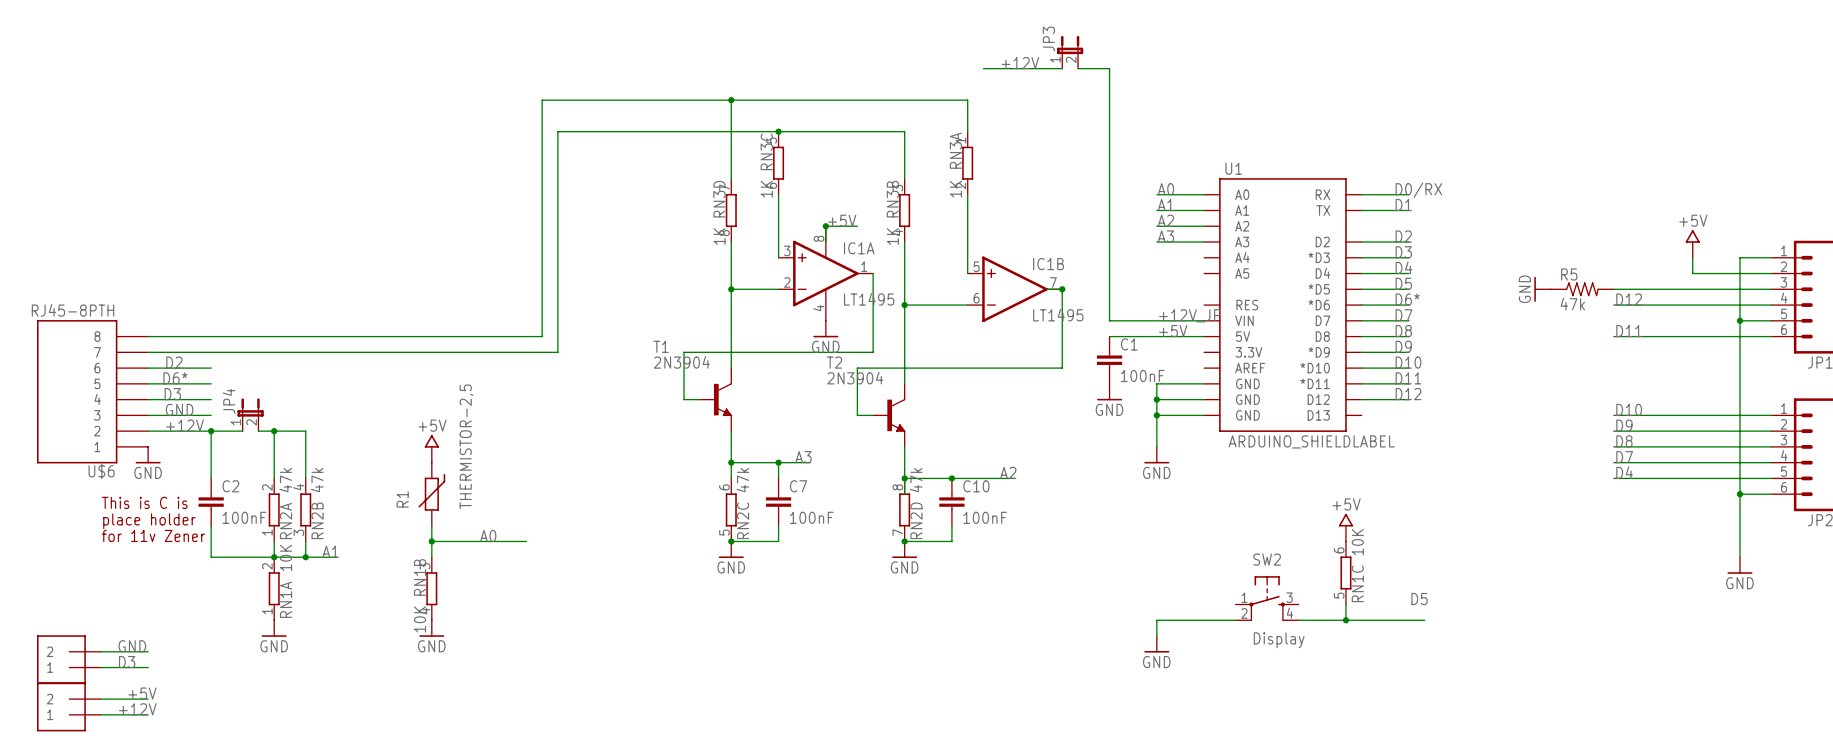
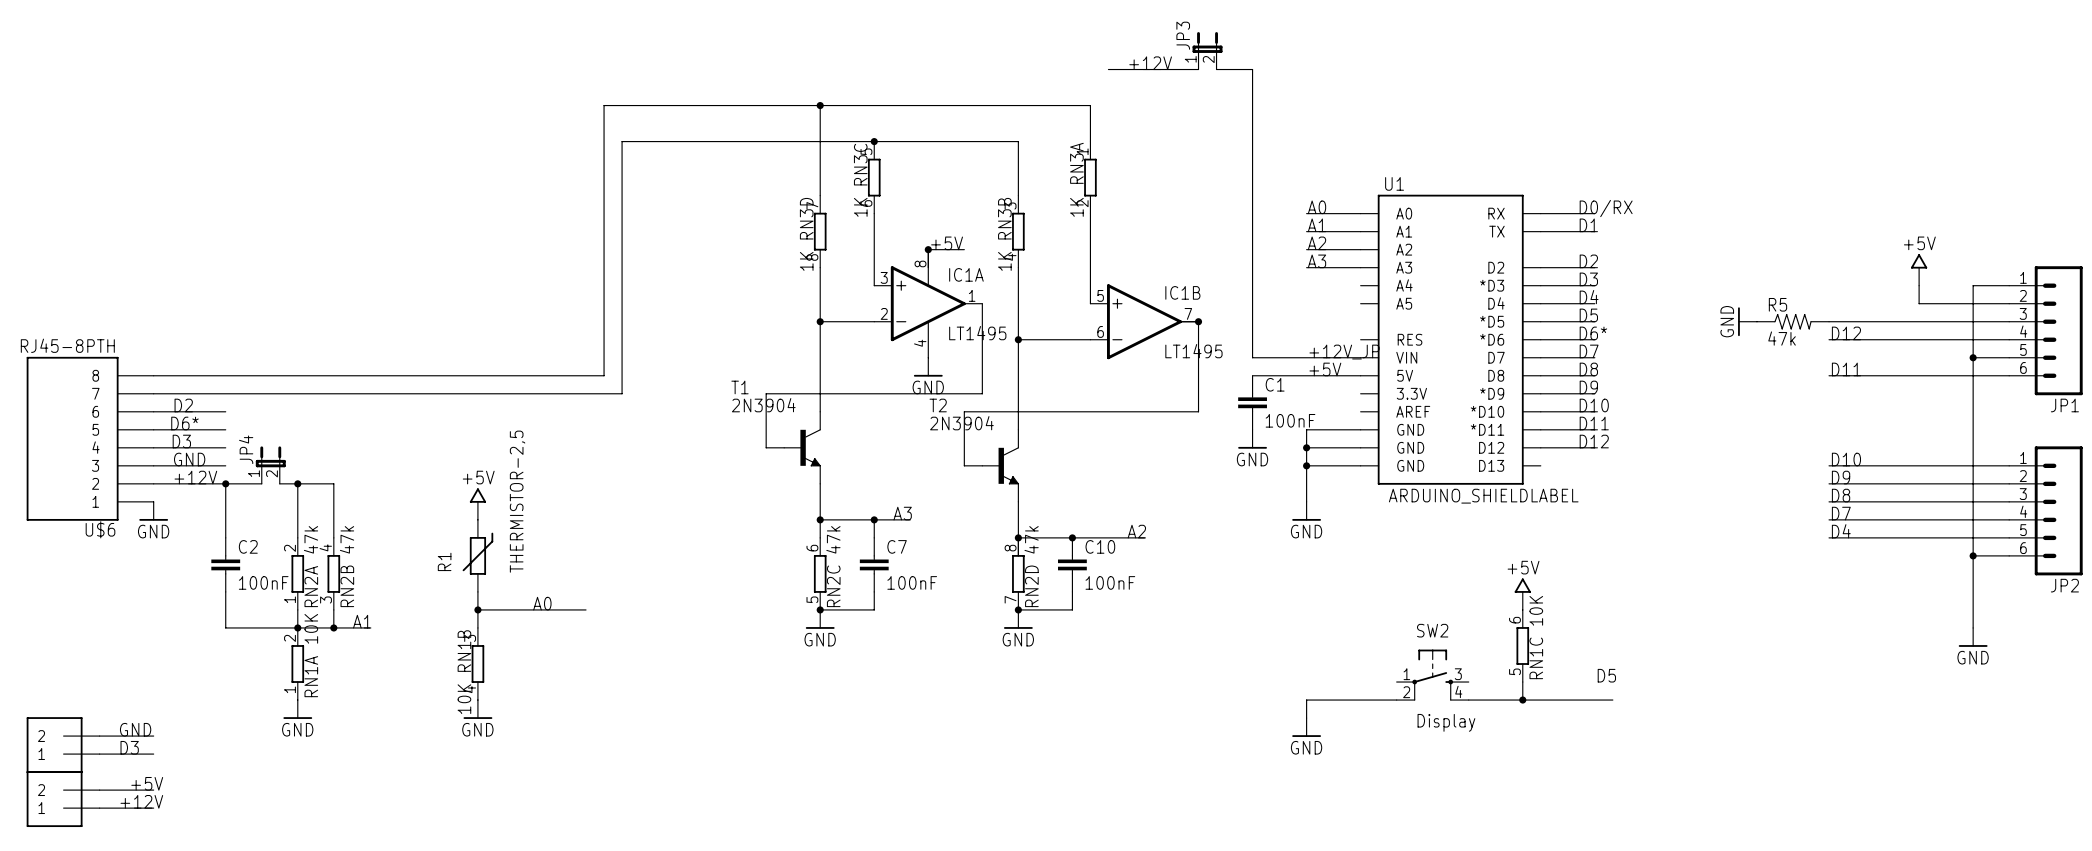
text: This is C is (144, 502) -> none
text: place holder (149, 521) -> none
text: for 11v Zener (153, 535) -> none

